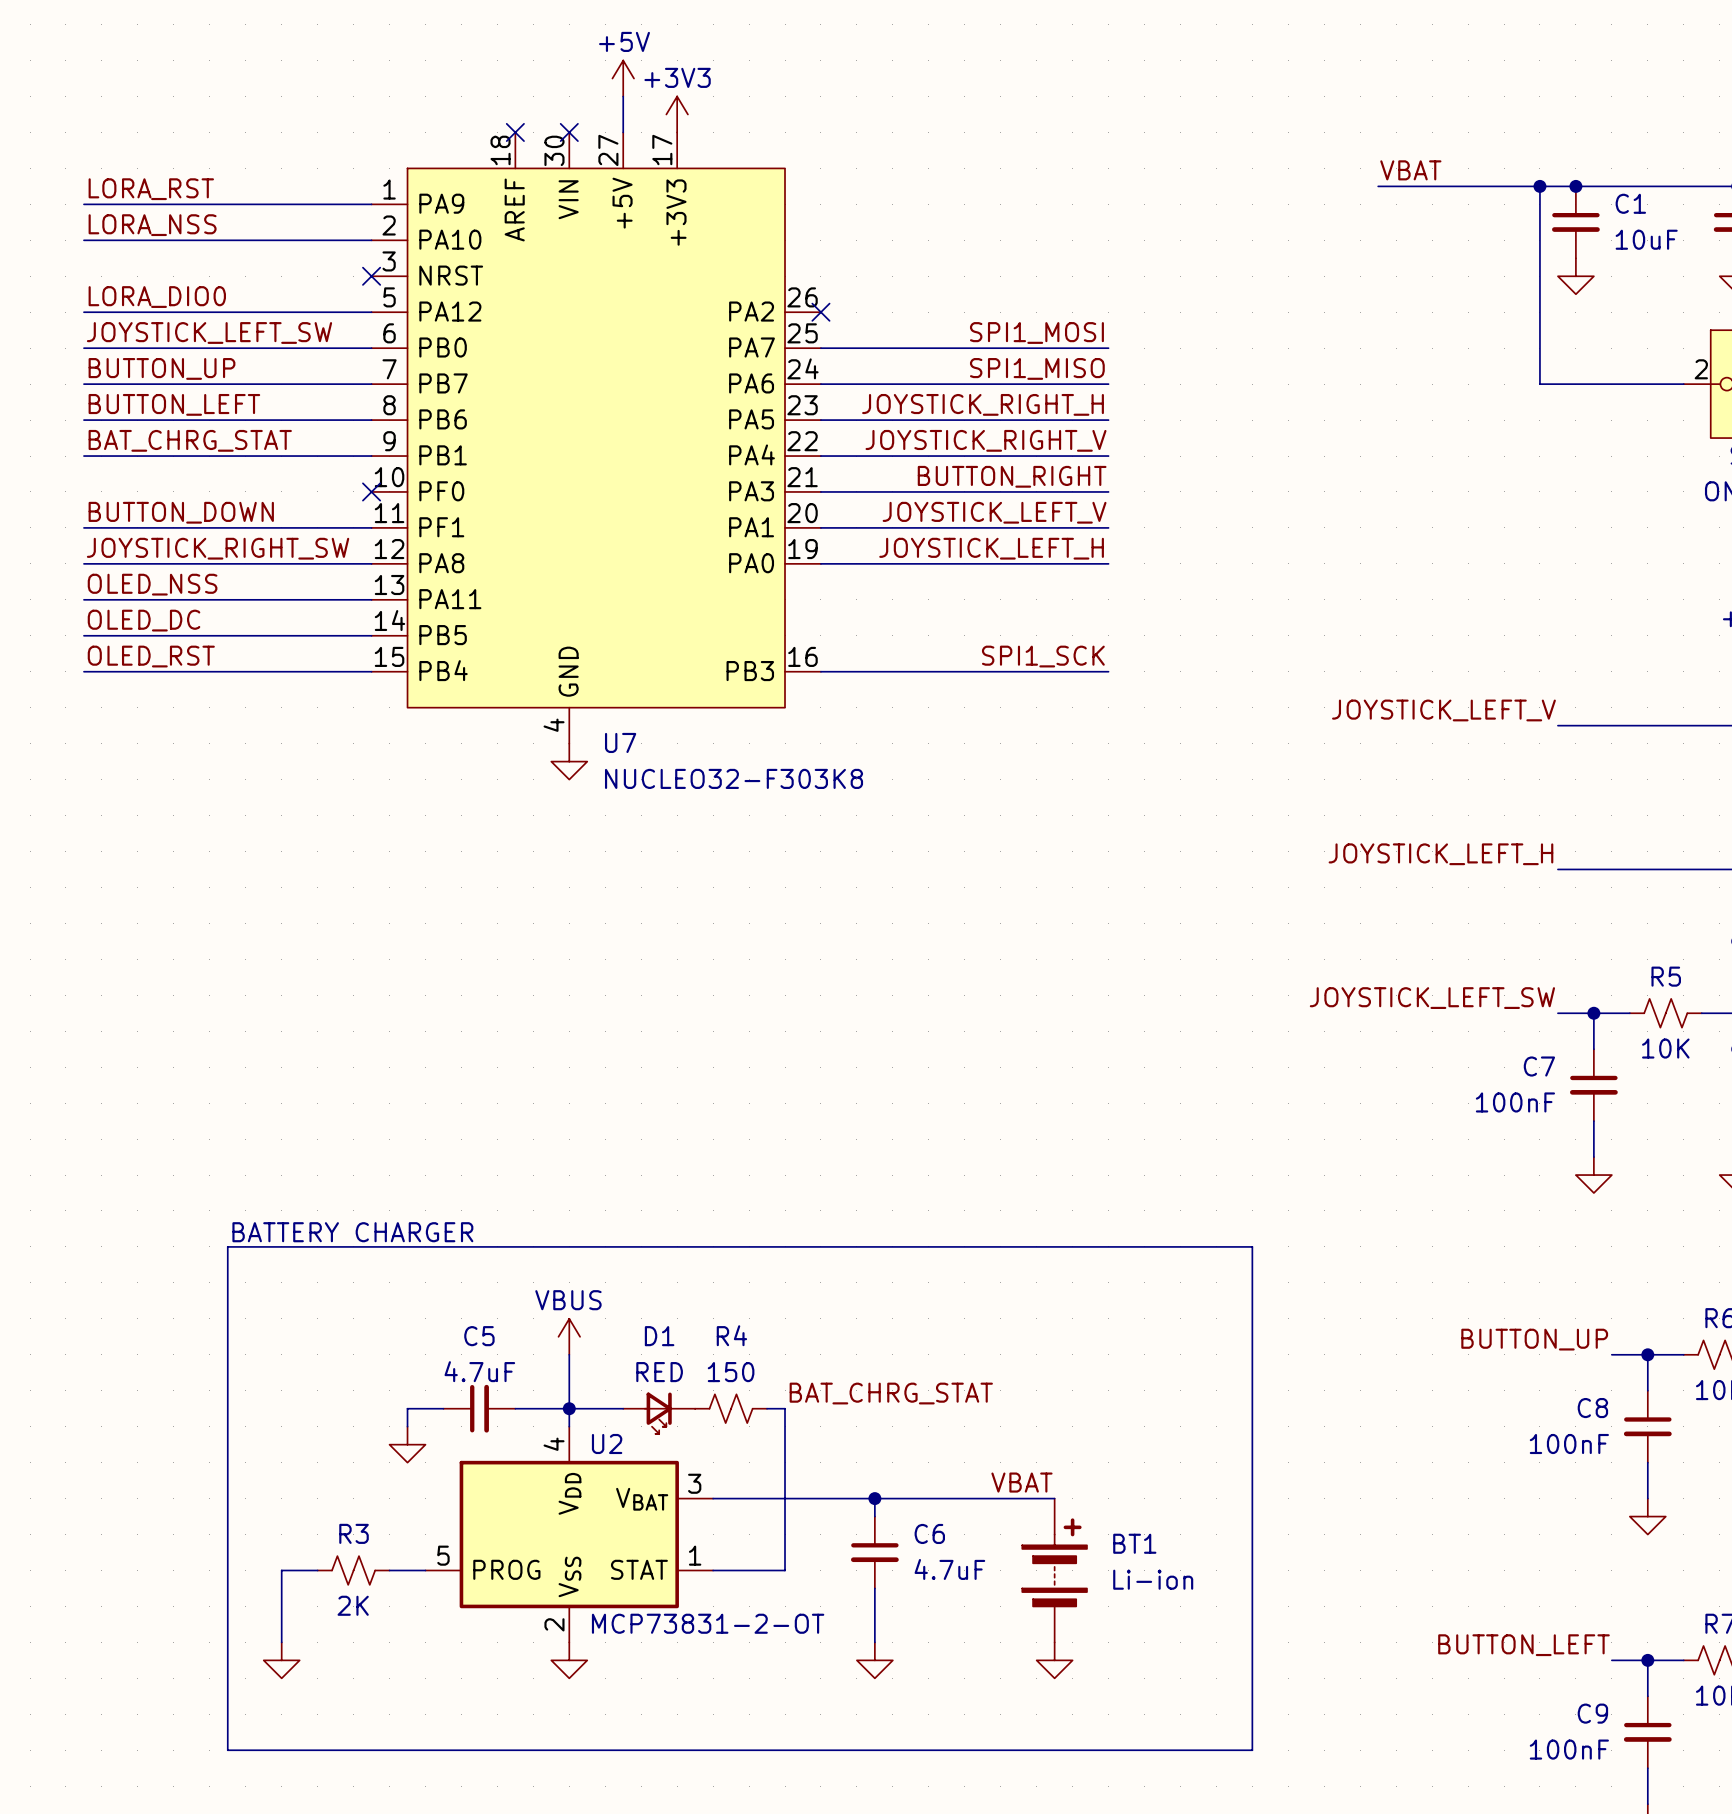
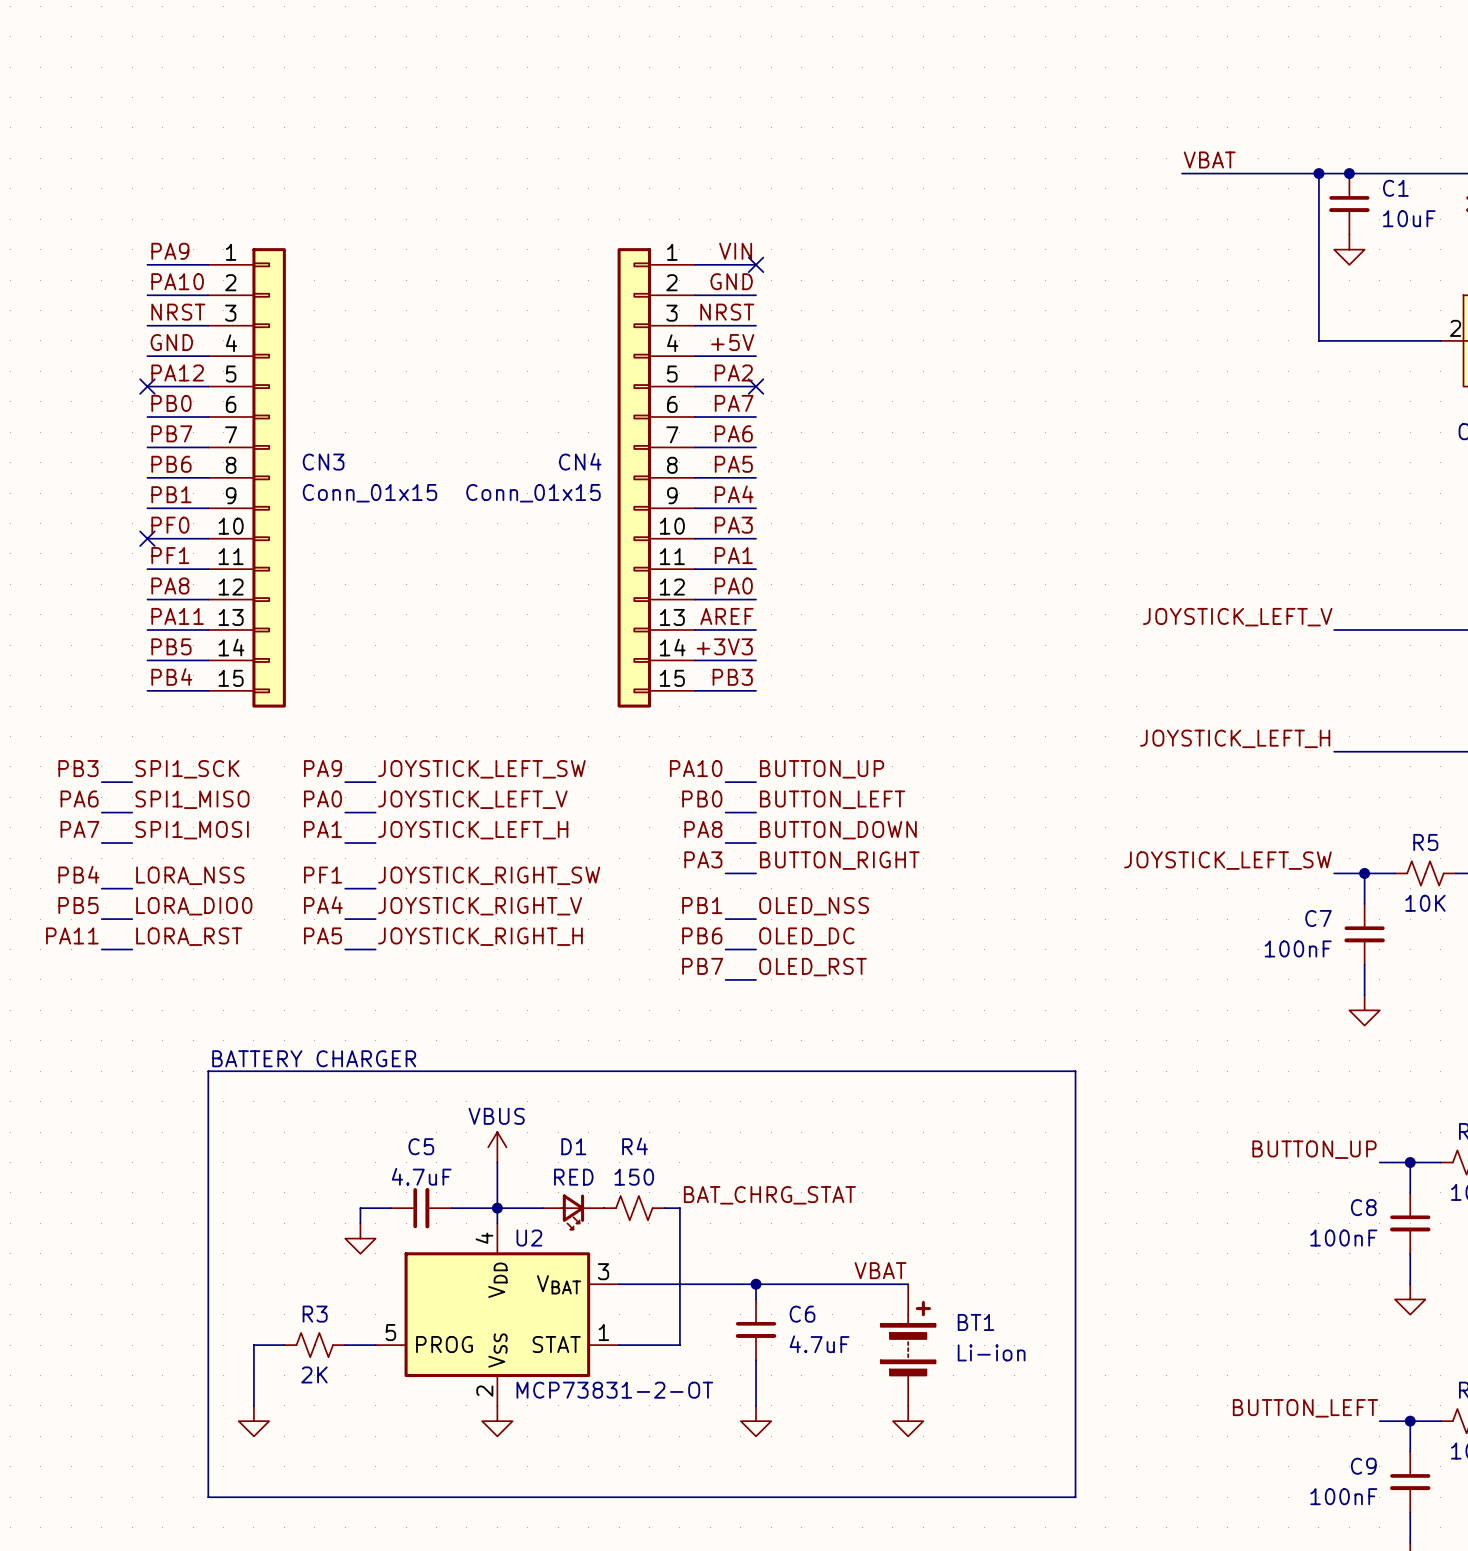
power symbol: +5V (623, 78) -> none
wire: (623, 96) (623, 132) -> none
power symbol: +3V3 (677, 114) -> none
no-connect mark: (515, 132) -> none
no-connect mark: (569, 132) -> none
label: LORA_RST (151, 189) -> none
wire: (83, 204) (371, 204) -> none
label: LORA_NSS (152, 225) -> none
wire: (83, 240) (371, 240) -> none
no-connect mark: (371, 276) -> none
label: none -> PA9 (170, 251)
label: none -> VIN (735, 251)
wire: none -> (147, 264) (208, 264)
wire: none -> (695, 264) (756, 264)
label: LORA_DIO0 (157, 297) -> none
wire: (83, 312) (371, 312) -> none
no-connect mark position: (820, 312) -> (756, 264)
label: none -> PA10 (177, 281)
label: none -> GND (731, 281)
wire: none -> (147, 295) (208, 295)
wire: none -> (695, 295) (756, 295)
label: JOYSTICK_LEFT_SW (209, 332) -> none
label: SPI1_MOSI (1036, 332) -> none
wire: (83, 348) (371, 348) -> none
wire: (820, 348) (1108, 348) -> none
label: none -> NRST (178, 312)
label: none -> NRST (727, 312)
wire: none -> (147, 325) (208, 325)
wire: none -> (695, 325) (756, 325)
label: BUTTON_UP (161, 368) -> none
label: SPI1_MISO (1037, 368) -> none
wire: (83, 384) (371, 384) -> none
wire: (820, 384) (1108, 384) -> none
label: none -> GND (171, 342)
label: none -> +5V (732, 342)
wire: none -> (147, 356) (208, 356)
wire: none -> (695, 356) (756, 356)
label: BUTTON_LEFT (174, 404) -> none
label: JOYSTICK_RIGHT_H (983, 404) -> none
wire: (83, 420) (371, 420) -> none
wire: (820, 420) (1108, 420) -> none
label: none -> PA12 (177, 372)
label: none -> PA2 (733, 372)
wire: none -> (147, 386) (208, 386)
no-connect mark: none -> (147, 386)
U7: NUCLEO32-F303K8 (596, 438) -> none
wire: none -> (695, 386) (756, 386)
no-connect mark: none -> (756, 386)
label: BAT_CHRG_STAT (190, 440) -> none
label: JOYSTICK_RIGHT_V (986, 440) -> none
wire: (83, 456) (371, 456) -> none
wire: (820, 456) (1108, 456) -> none
label: none -> PB0 (171, 403)
label: none -> PA7 (734, 403)
wire: none -> (147, 417) (208, 417)
wire: none -> (695, 417) (756, 417)
label: BUTTON_RIGHT (1012, 476) -> none
no-connect mark: (371, 491) -> none
wire: (820, 491) (1108, 491) -> none
label: none -> PB7 (171, 433)
label: none -> PA6 (733, 433)
wire: none -> (147, 447) (208, 447)
wire: none -> (695, 447) (756, 447)
label: BUTTON_DOWN (181, 512) -> none
label: JOYSTICK_LEFT_V (994, 512) -> none
wire: (83, 527) (371, 527) -> none
wire: (820, 527) (1108, 527) -> none
label: none -> PB6 (171, 464)
label: none -> PA5 (733, 464)
wire: none -> (147, 477) (208, 477)
CN3: none -> Conn_01x15 (247, 477)
CN4: none -> Conn_01x15 (656, 477)
wire: none -> (695, 477) (756, 477)
label: JOYSTICK_RIGHT_SW (218, 548) -> none
label: JOYSTICK_LEFT_H (991, 548) -> none
wire: (83, 563) (371, 563) -> none
wire: (820, 563) (1108, 563) -> none
label: none -> PB1 (171, 494)
label: none -> PA4 (734, 494)
wire: none -> (147, 508) (208, 508)
wire: none -> (695, 508) (756, 508)
label: OLED_NSS (152, 584) -> none
wire: (83, 599) (371, 599) -> none
label: none -> PF0 (170, 525)
label: none -> PA3 (733, 525)
wire: none -> (147, 538) (208, 538)
no-connect mark: none -> (147, 538)
wire: none -> (695, 538) (756, 538)
label: OLED_DC (144, 620) -> none
wire: (83, 635) (371, 635) -> none
label: none -> PF1 (170, 555)
label: none -> PA1 (733, 555)
wire: none -> (147, 569) (208, 569)
wire: none -> (695, 569) (756, 569)
label: OLED_RST (151, 656) -> none
label: SPI1_SCK (1043, 656) -> none
wire: (83, 671) (371, 671) -> none
wire: (820, 671) (1108, 671) -> none
label: none -> PA8 (170, 586)
label: none -> PA0 (733, 586)
wire: none -> (147, 599) (208, 599)
wire: none -> (695, 599) (756, 599)
label: none -> PA11 (177, 616)
label: none -> AREF (726, 616)
wire: none -> (147, 630) (208, 630)
wire: none -> (695, 630) (756, 630)
label: none -> PB5 (171, 646)
label: none -> +3V3 (724, 646)
wire: none -> (147, 660) (208, 660)
power symbol: (569, 761) -> none
wire: none -> (695, 660) (756, 660)
label: none -> PB4 (171, 676)
label: none -> PB3 (732, 677)
wire: none -> (147, 690) (208, 690)
wire: none -> (695, 690) (756, 690)
label: none -> PB3 (78, 768)
label: none -> PA9 (323, 768)
label: none -> PA10 (696, 768)
label: none -> SPI1_SCK (187, 769)
label: none -> JOYSTICK_LEFT_SW (481, 769)
label: none -> BUTTON_UP (822, 769)
wire: none -> (101, 782) (132, 782)
wire: none -> (345, 782) (375, 782)
wire: none -> (725, 782) (756, 782)
label: none -> PA6 (79, 799)
label: none -> PA0 (323, 799)
label: none -> PB0 (702, 799)
label: none -> SPI1_MISO (192, 799)
label: none -> JOYSTICK_LEFT_V (472, 799)
label: none -> BUTTON_LEFT (832, 799)
wire: none -> (101, 812) (132, 812)
wire: none -> (345, 812) (375, 812)
wire: none -> (725, 812) (756, 812)
label: none -> PA7 (79, 829)
label: none -> PA1 (323, 829)
label: none -> PA8 (703, 829)
label: none -> SPI1_MOSI (192, 830)
label: none -> JOYSTICK_LEFT_H (473, 830)
label: none -> BUTTON_DOWN (838, 830)
wire: none -> (101, 843) (132, 843)
wire: none -> (345, 843) (375, 843)
wire: none -> (725, 843) (756, 843)
label: none -> PA3 (703, 859)
label: none -> BUTTON_RIGHT (839, 860)
wire: none -> (725, 873) (756, 873)
label: none -> PB4 (78, 874)
label: none -> PF1 (323, 875)
label: none -> LORA_NSS (190, 875)
label: none -> JOYSTICK_RIGHT_SW (489, 875)
wire: none -> (101, 888) (132, 888)
wire: none -> (345, 888) (375, 888)
label: none -> PA4 (323, 905)
label: none -> PB5 (78, 905)
label: none -> PB1 (702, 905)
label: none -> LORA_DIO0 (194, 906)
label: none -> JOYSTICK_RIGHT_V (480, 906)
label: none -> OLED_NSS (814, 906)
wire: none -> (101, 919) (132, 919)
wire: none -> (345, 919) (375, 919)
wire: none -> (725, 919) (756, 919)
label: none -> PA11 (72, 935)
label: none -> LORA_RST (189, 936)
label: none -> PA5 (323, 935)
label: none -> JOYSTICK_RIGHT_H (480, 936)
label: none -> PB6 (702, 935)
label: none -> OLED_DC (806, 936)
wire: none -> (101, 949) (132, 949)
wire: none -> (345, 949) (375, 949)
wire: none -> (725, 949) (756, 949)
label: none -> PB7 (702, 966)
label: none -> OLED_RST (813, 967)
wire: none -> (725, 979) (756, 979)

